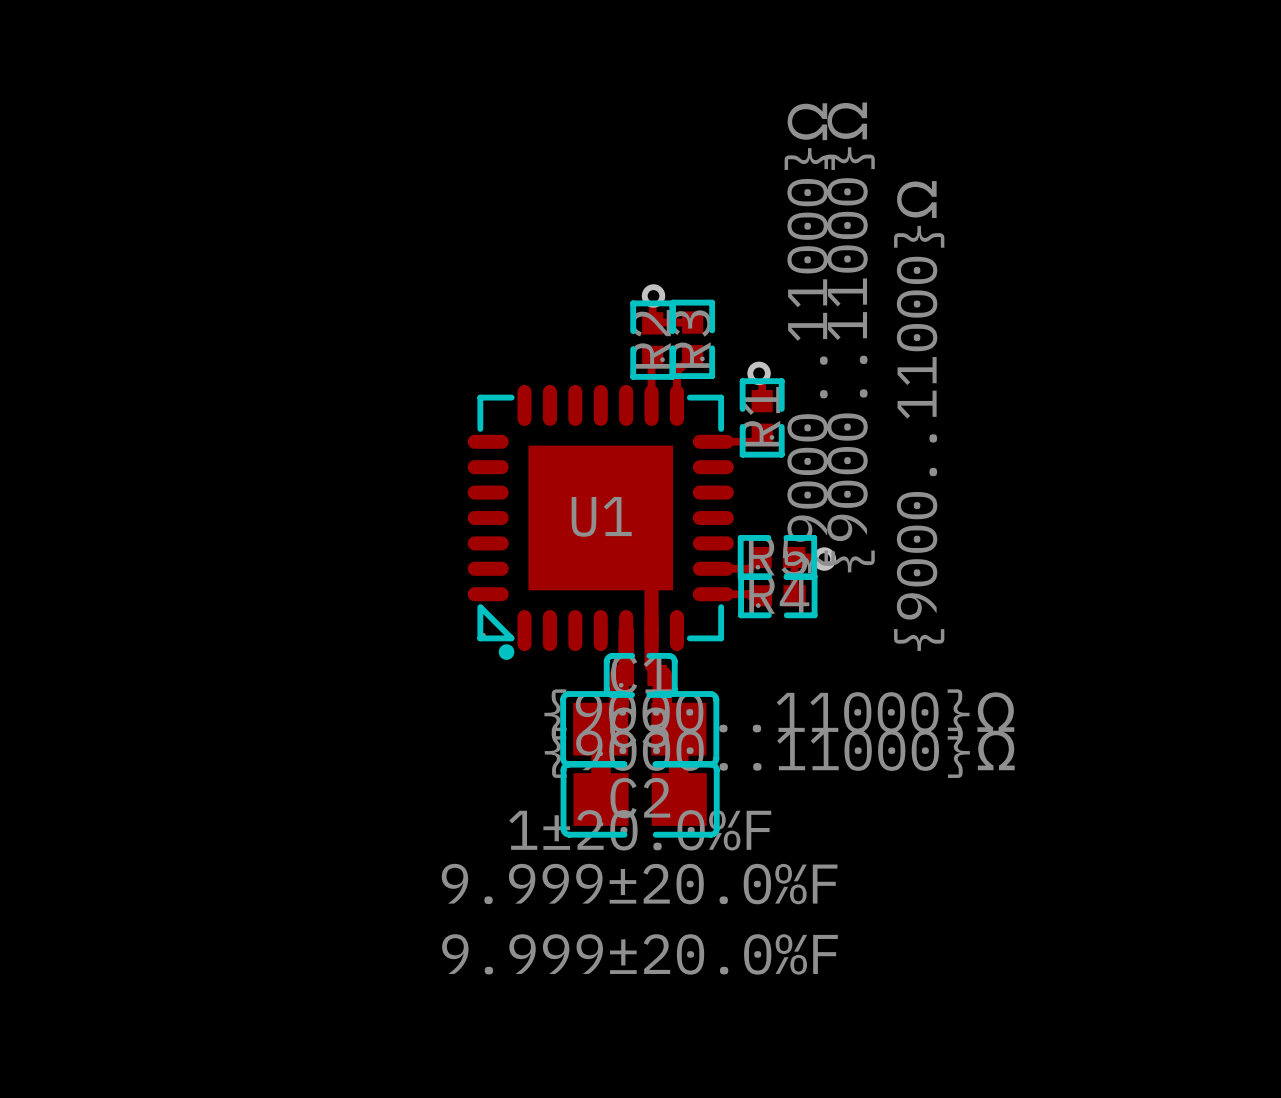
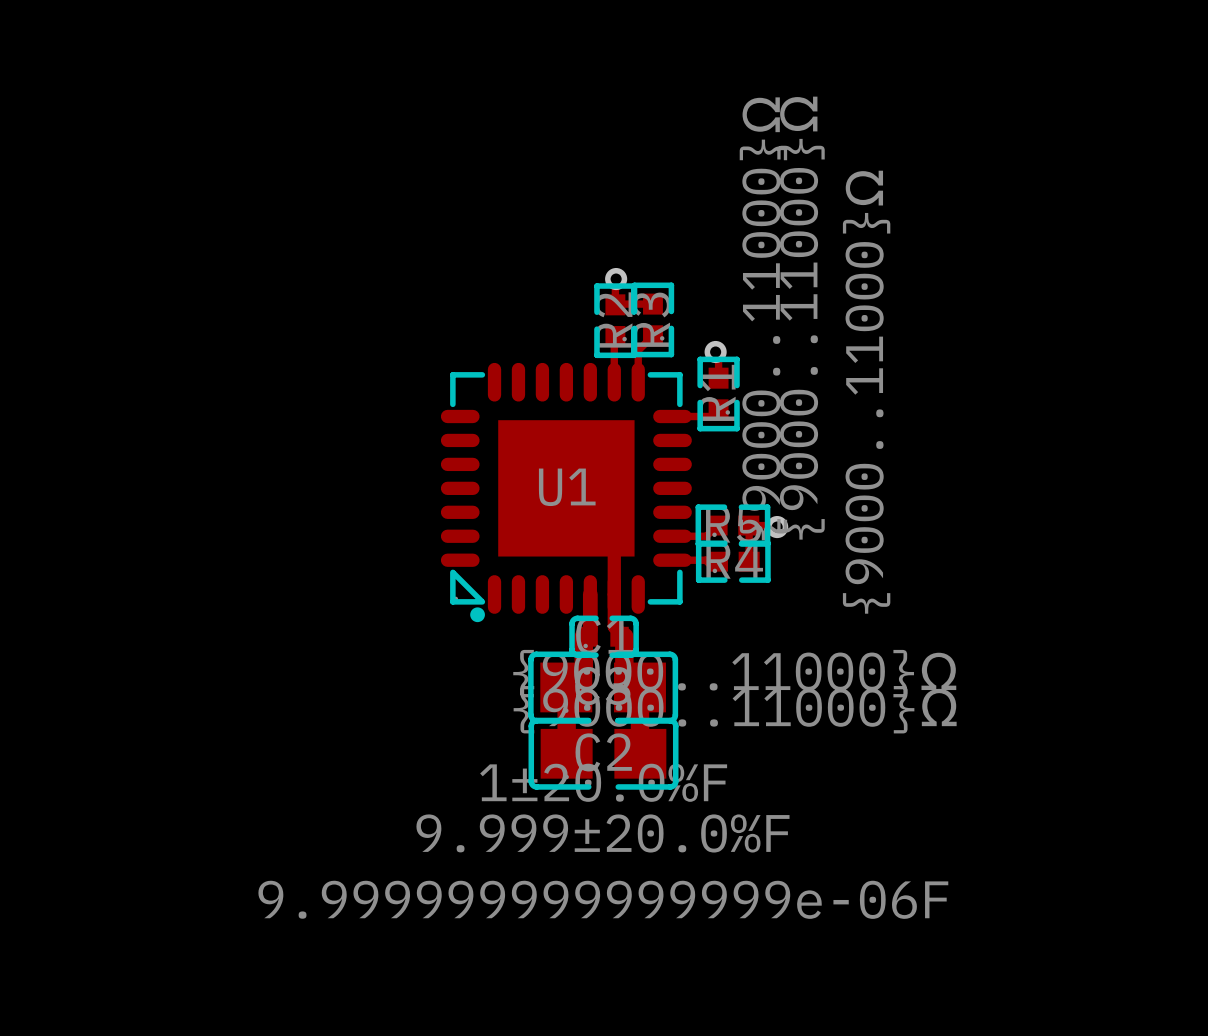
C2 value: 9.999±20.0%F (639, 954) -> 9.999999999999999e-06F (603, 899)

